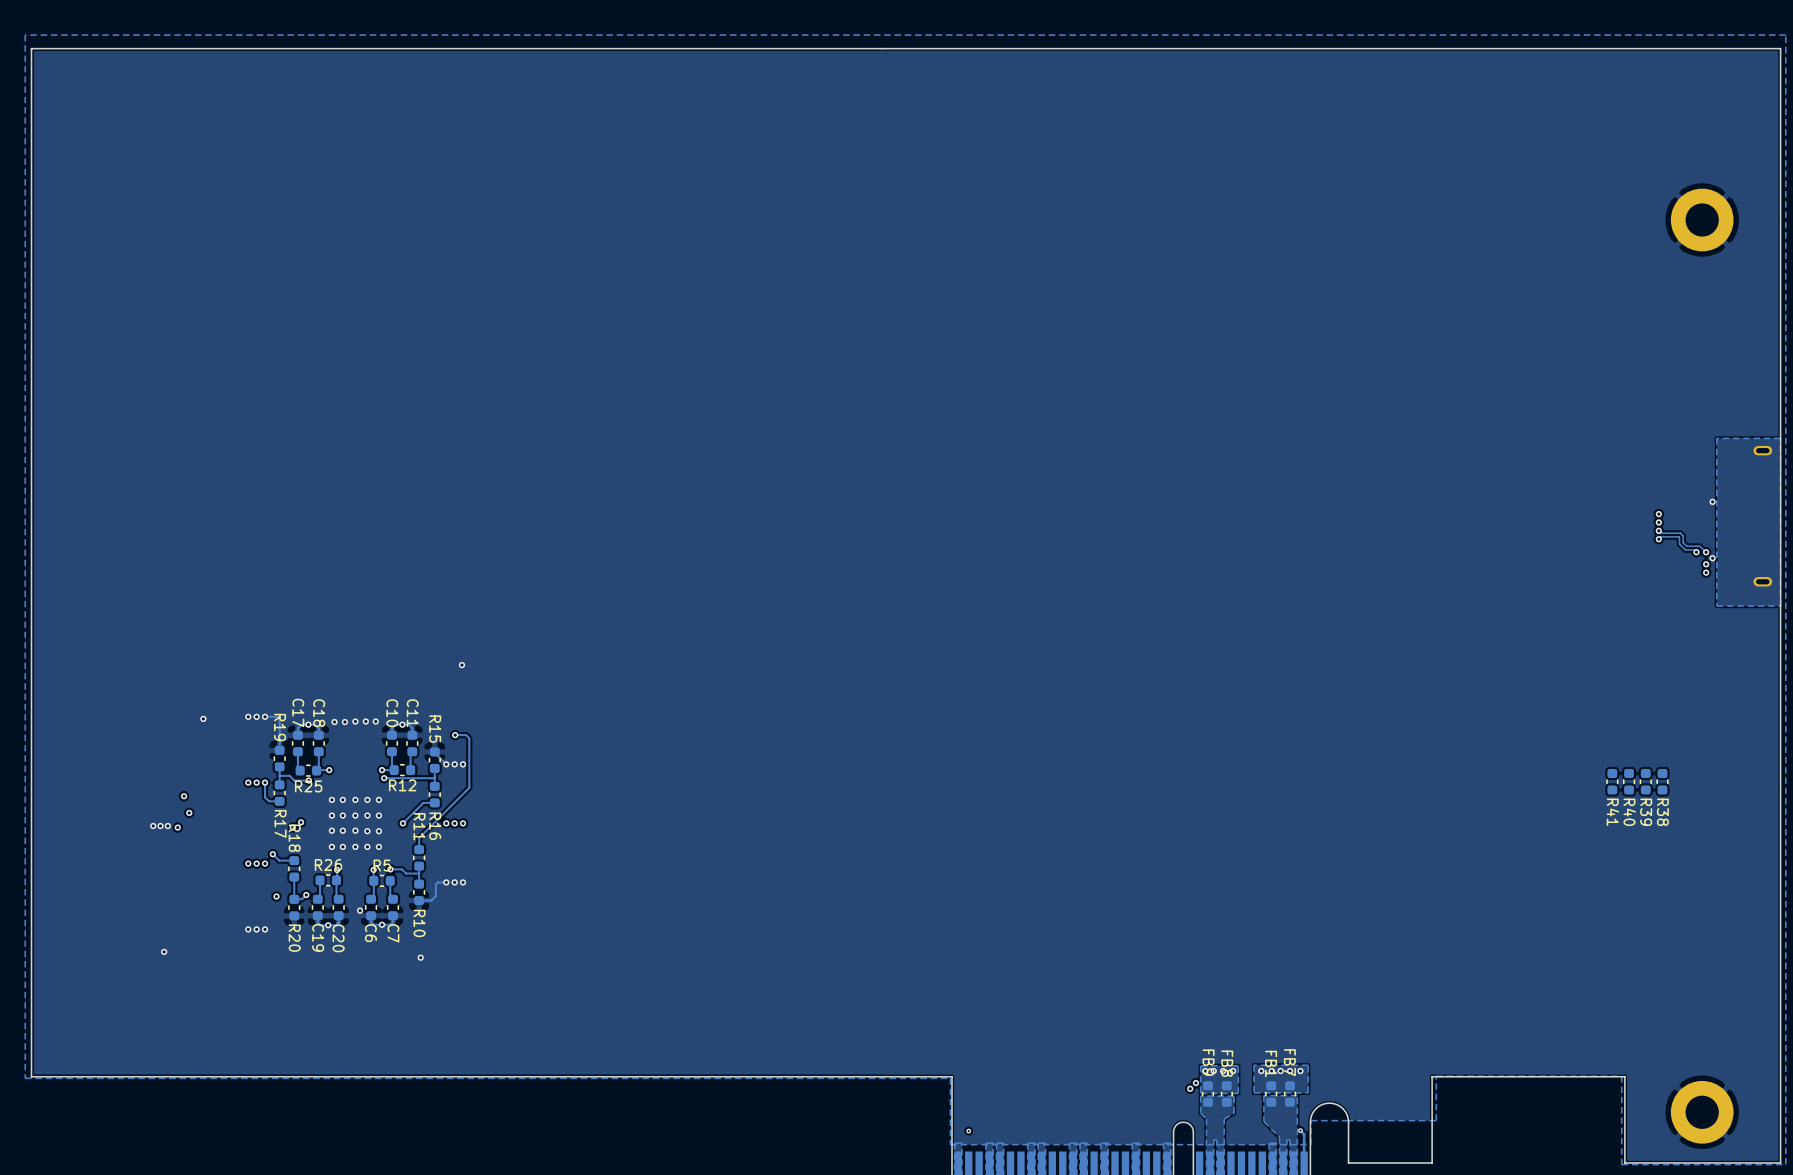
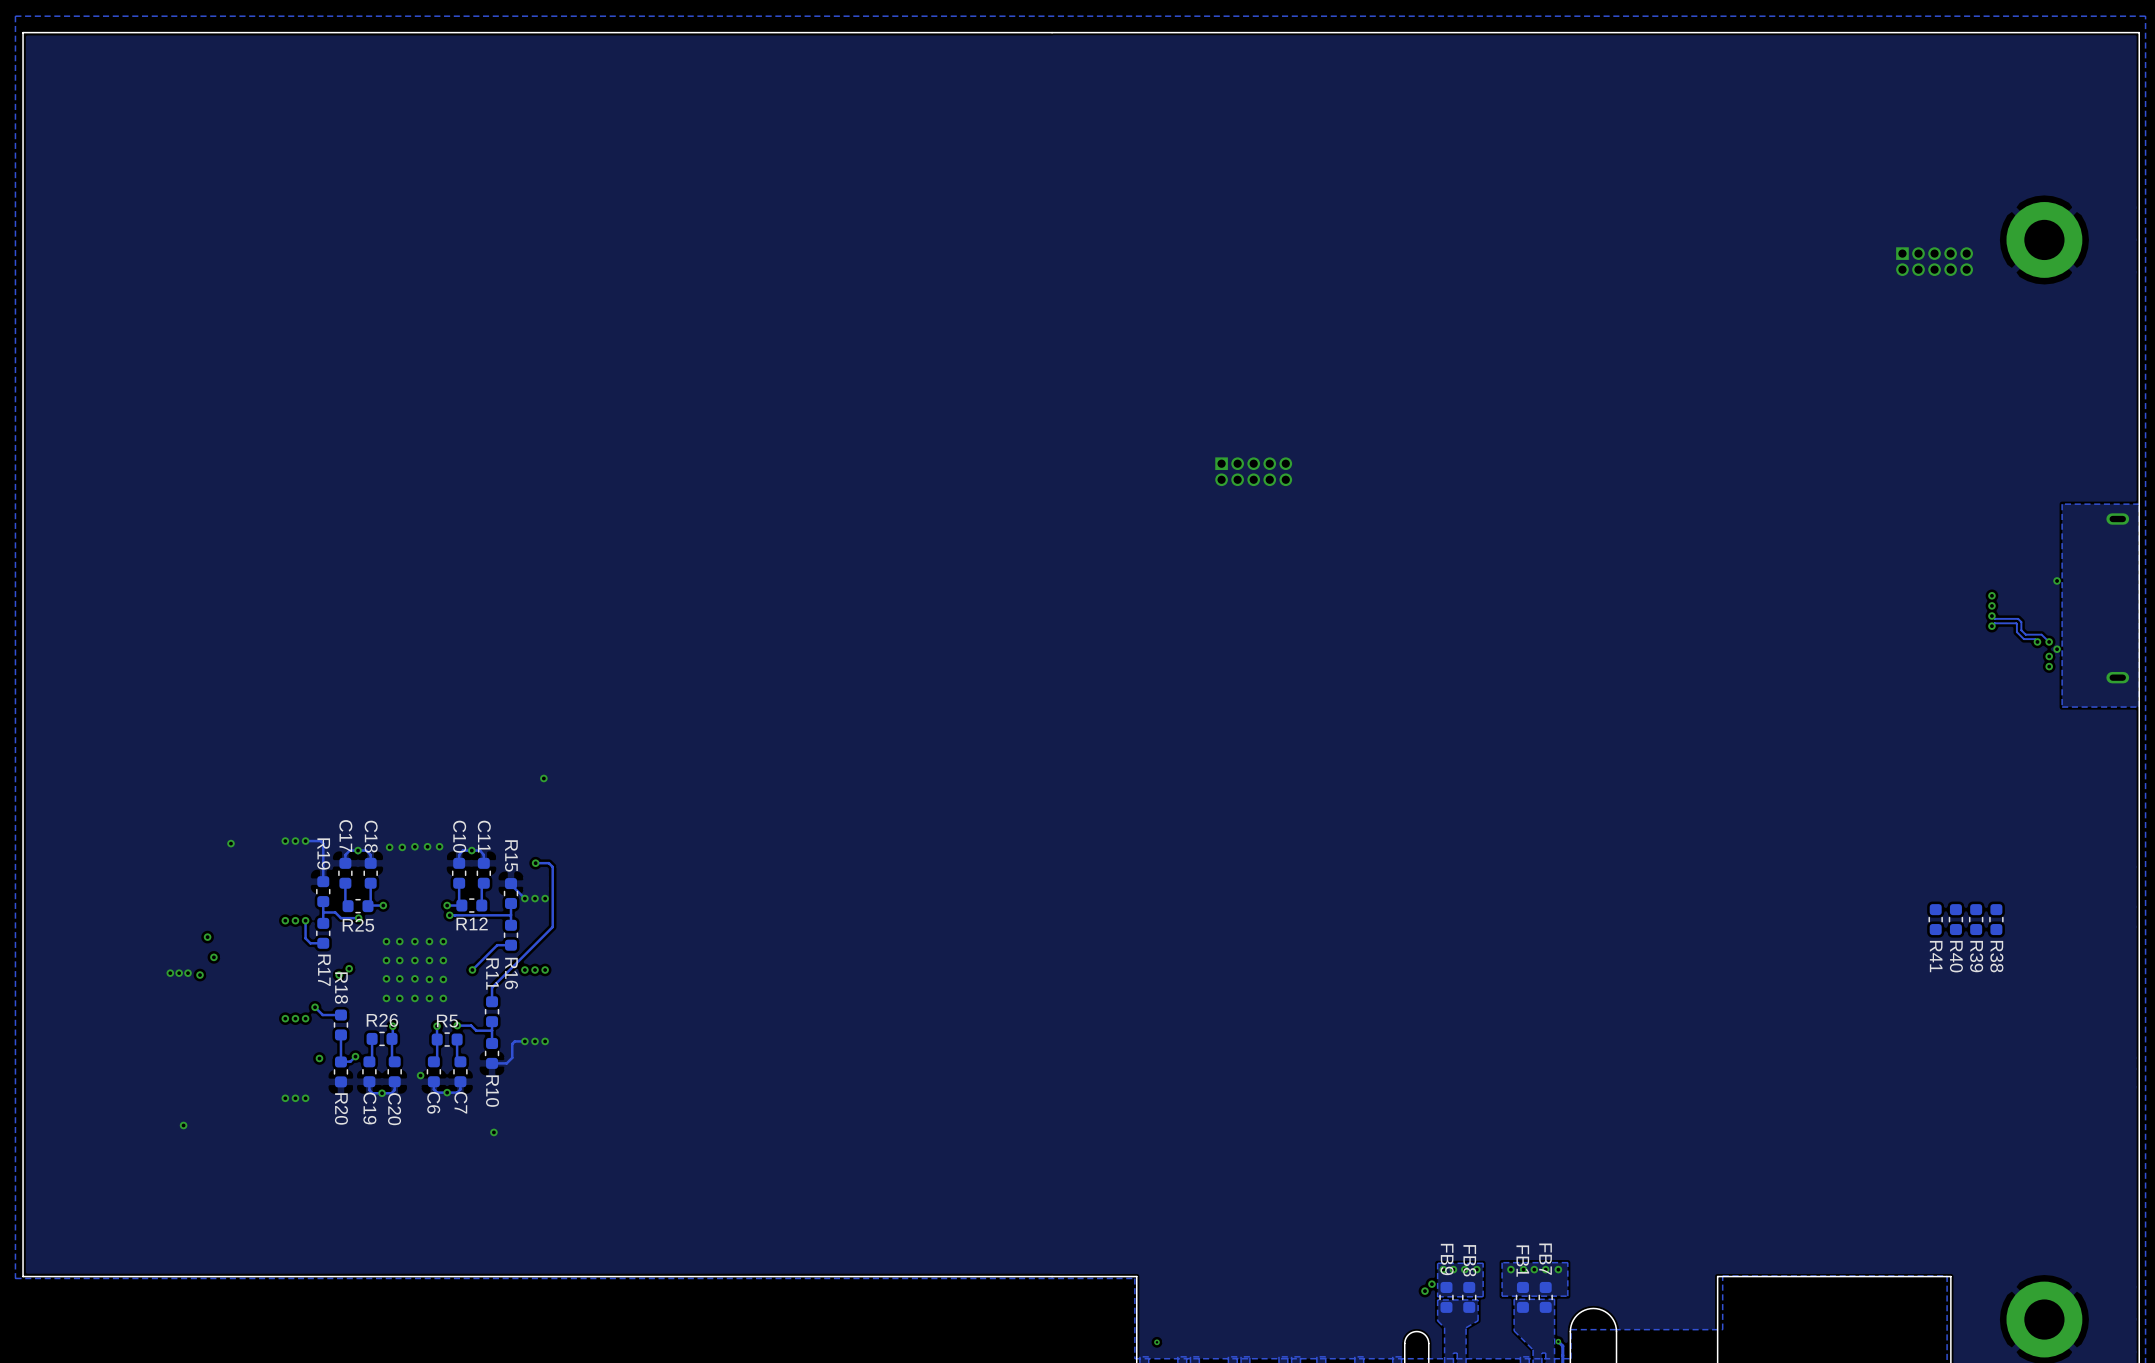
part: none -> (1934, 261)
part: none -> (1253, 471)

